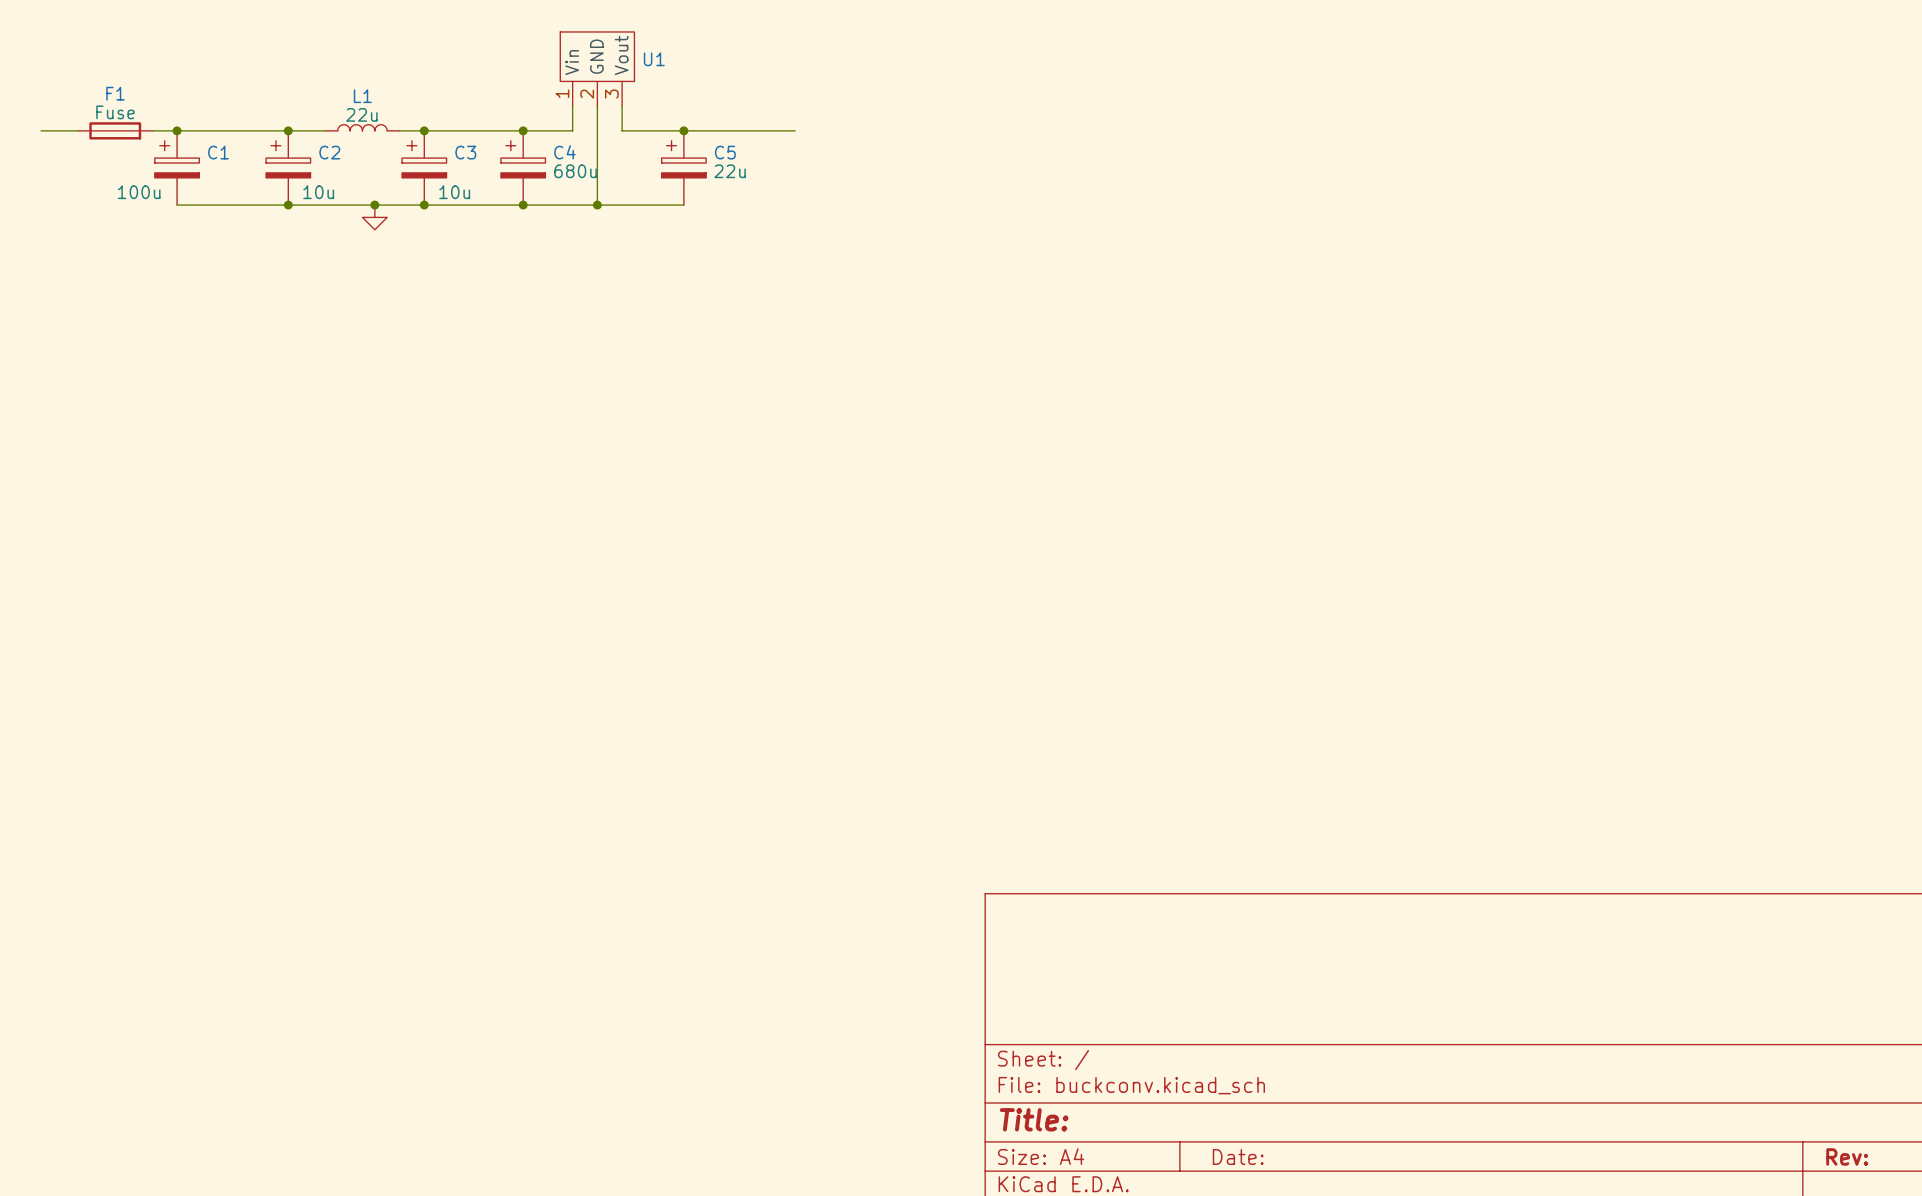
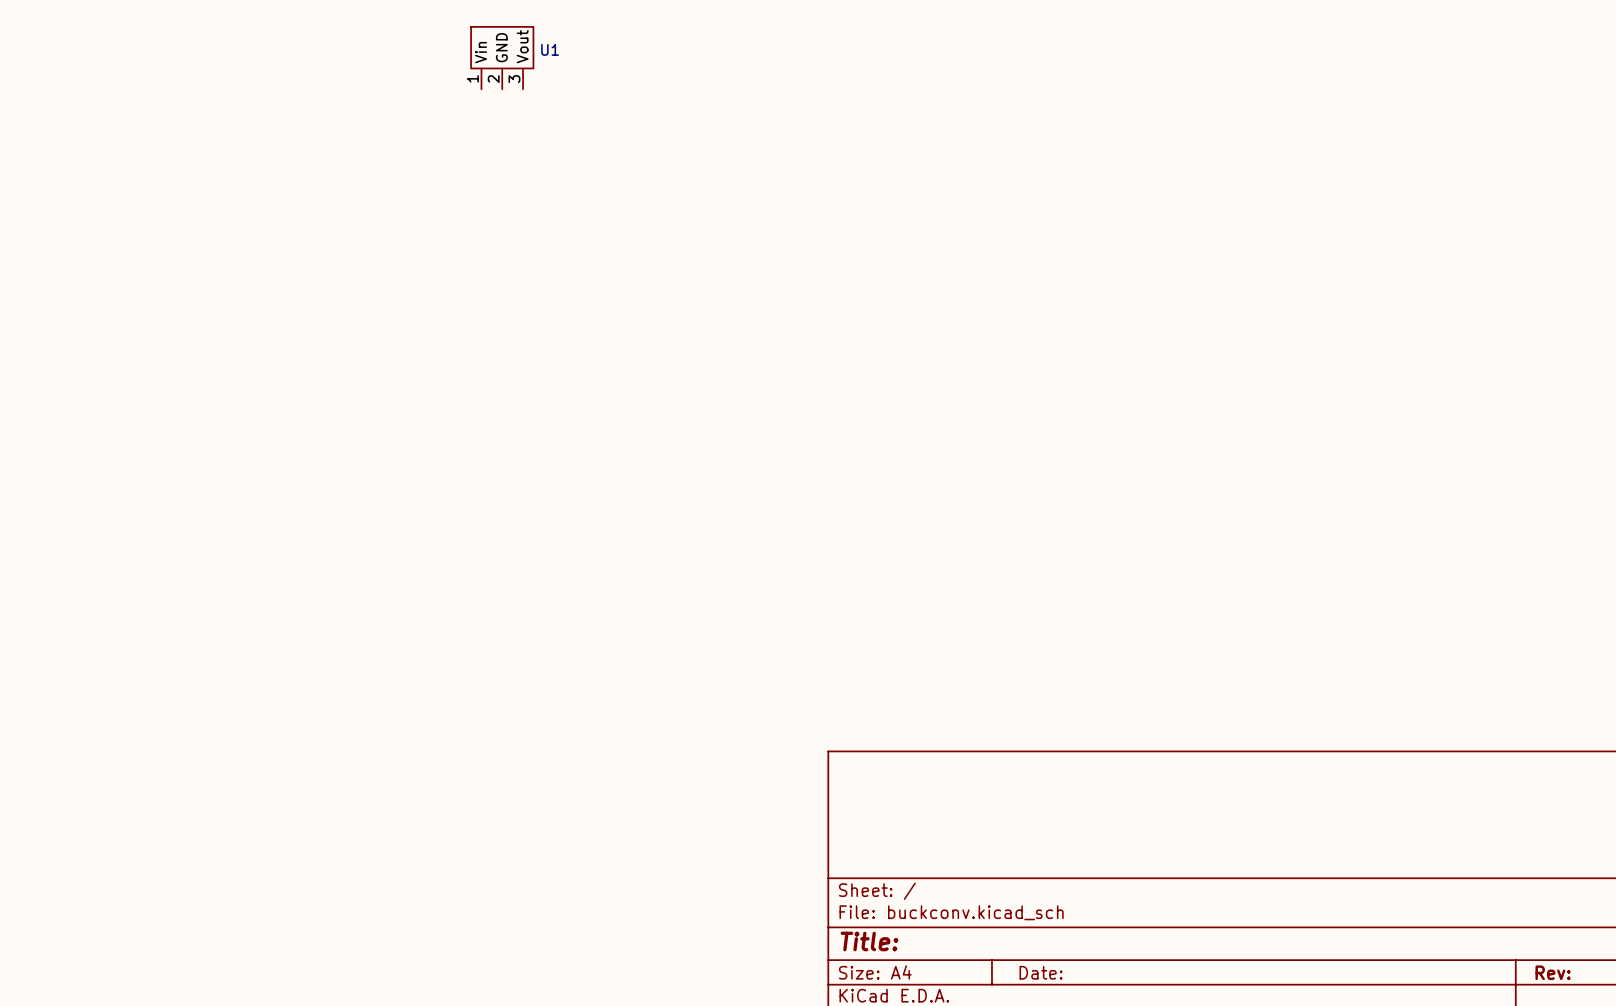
wire: (572, 106) (572, 130) (399, 130) -> none
wire: (597, 106) (597, 205) -> none
wire: (622, 106) (622, 130) (795, 130) -> none
L1: 22u (362, 127) -> none
wire: (41, 130) (78, 130) -> none
F1: Fuse (115, 130) -> none
wire: (152, 130) (325, 130) -> none
junction: (177, 130) -> none
junction: (288, 130) -> none
junction: (424, 130) -> none
junction: (523, 130) -> none
junction: (683, 130) -> none
C1: 100u (177, 167) -> none
C2: 10u (288, 167) -> none
C3: 10u (424, 167) -> none
C4: 680u (523, 167) -> none
C5: 22u (683, 167) -> none
wire: (177, 205) (683, 205) -> none
junction: (288, 205) -> none
junction: (374, 205) -> none
junction: (424, 205) -> none
junction: (523, 205) -> none
junction: (597, 205) -> none
power symbol: (374, 217) -> none

